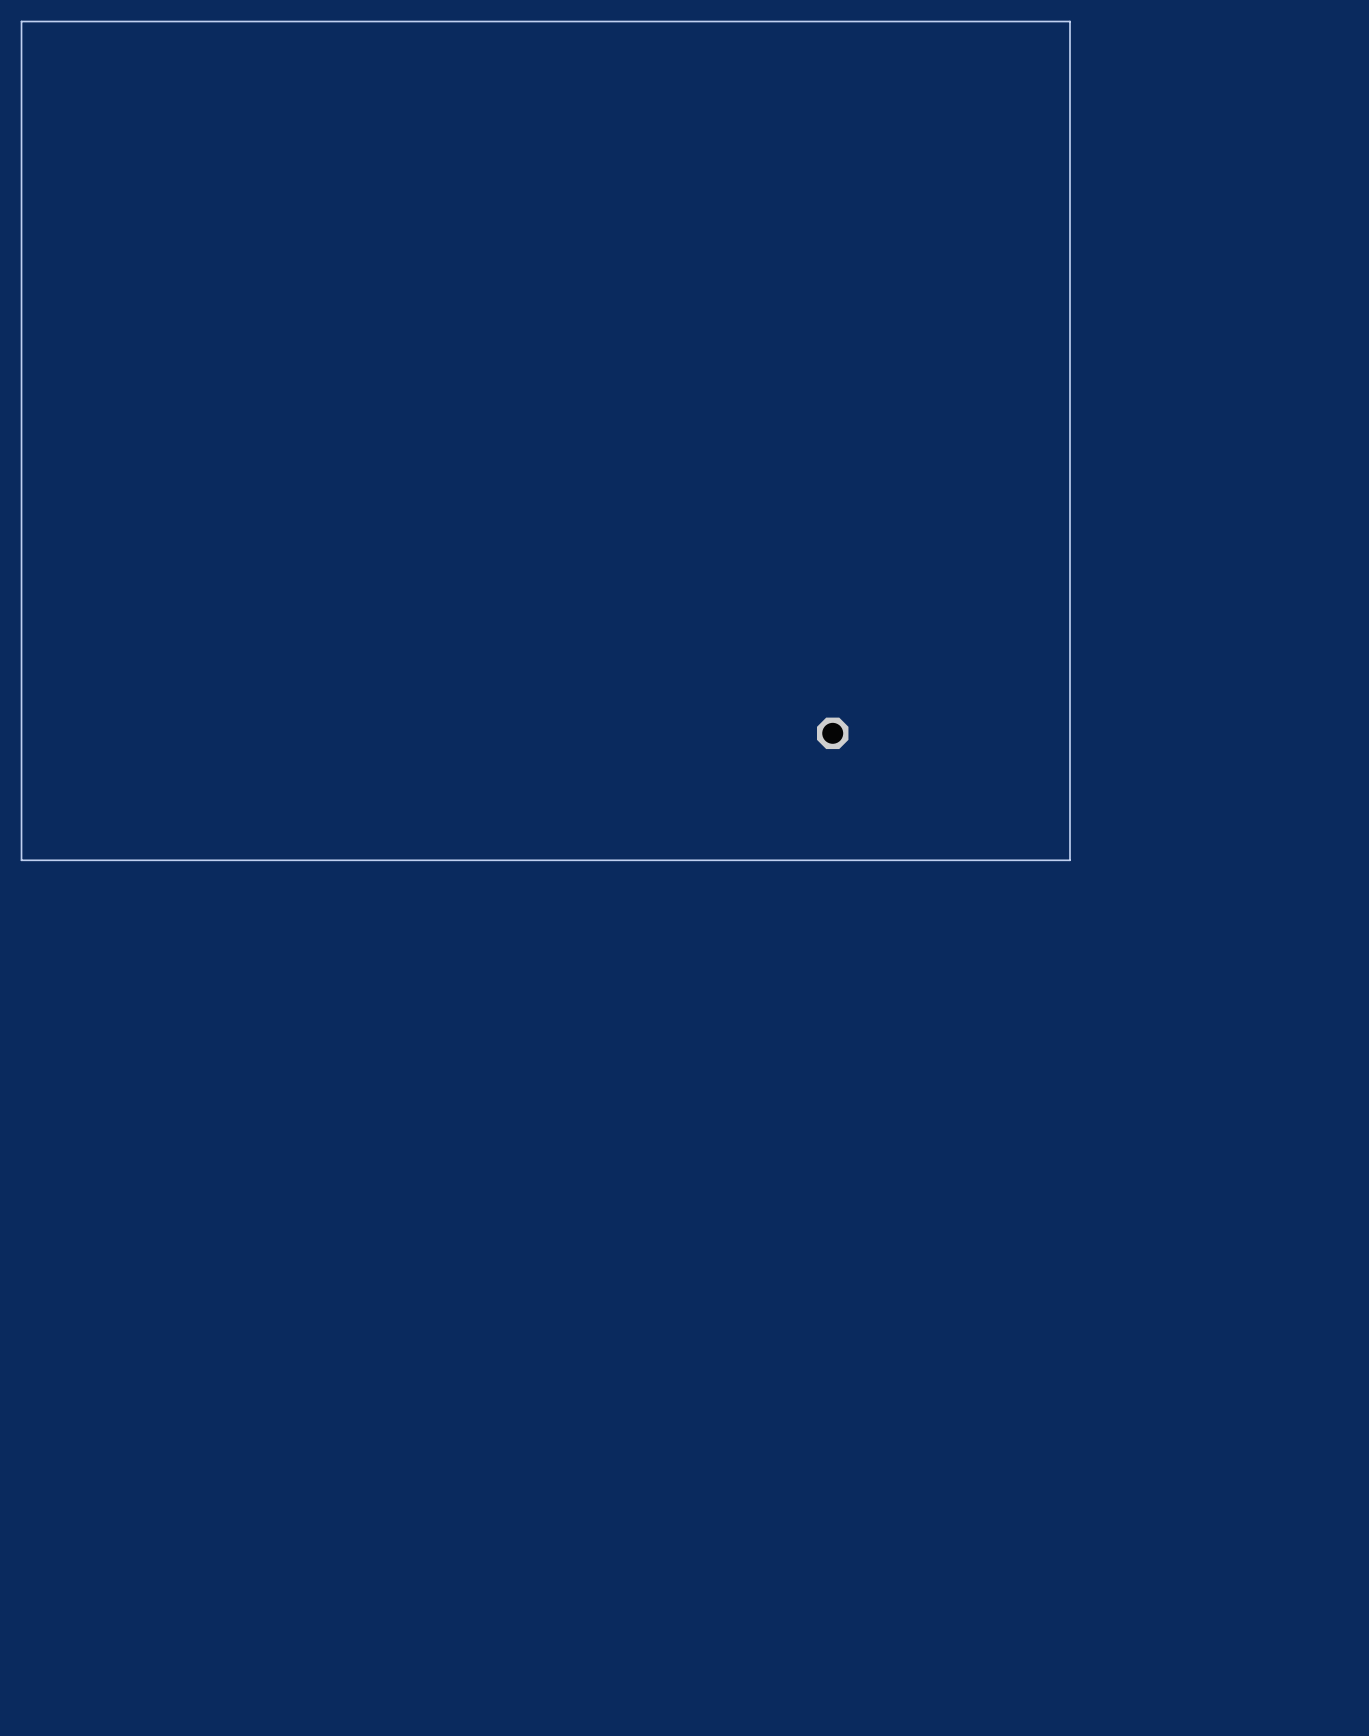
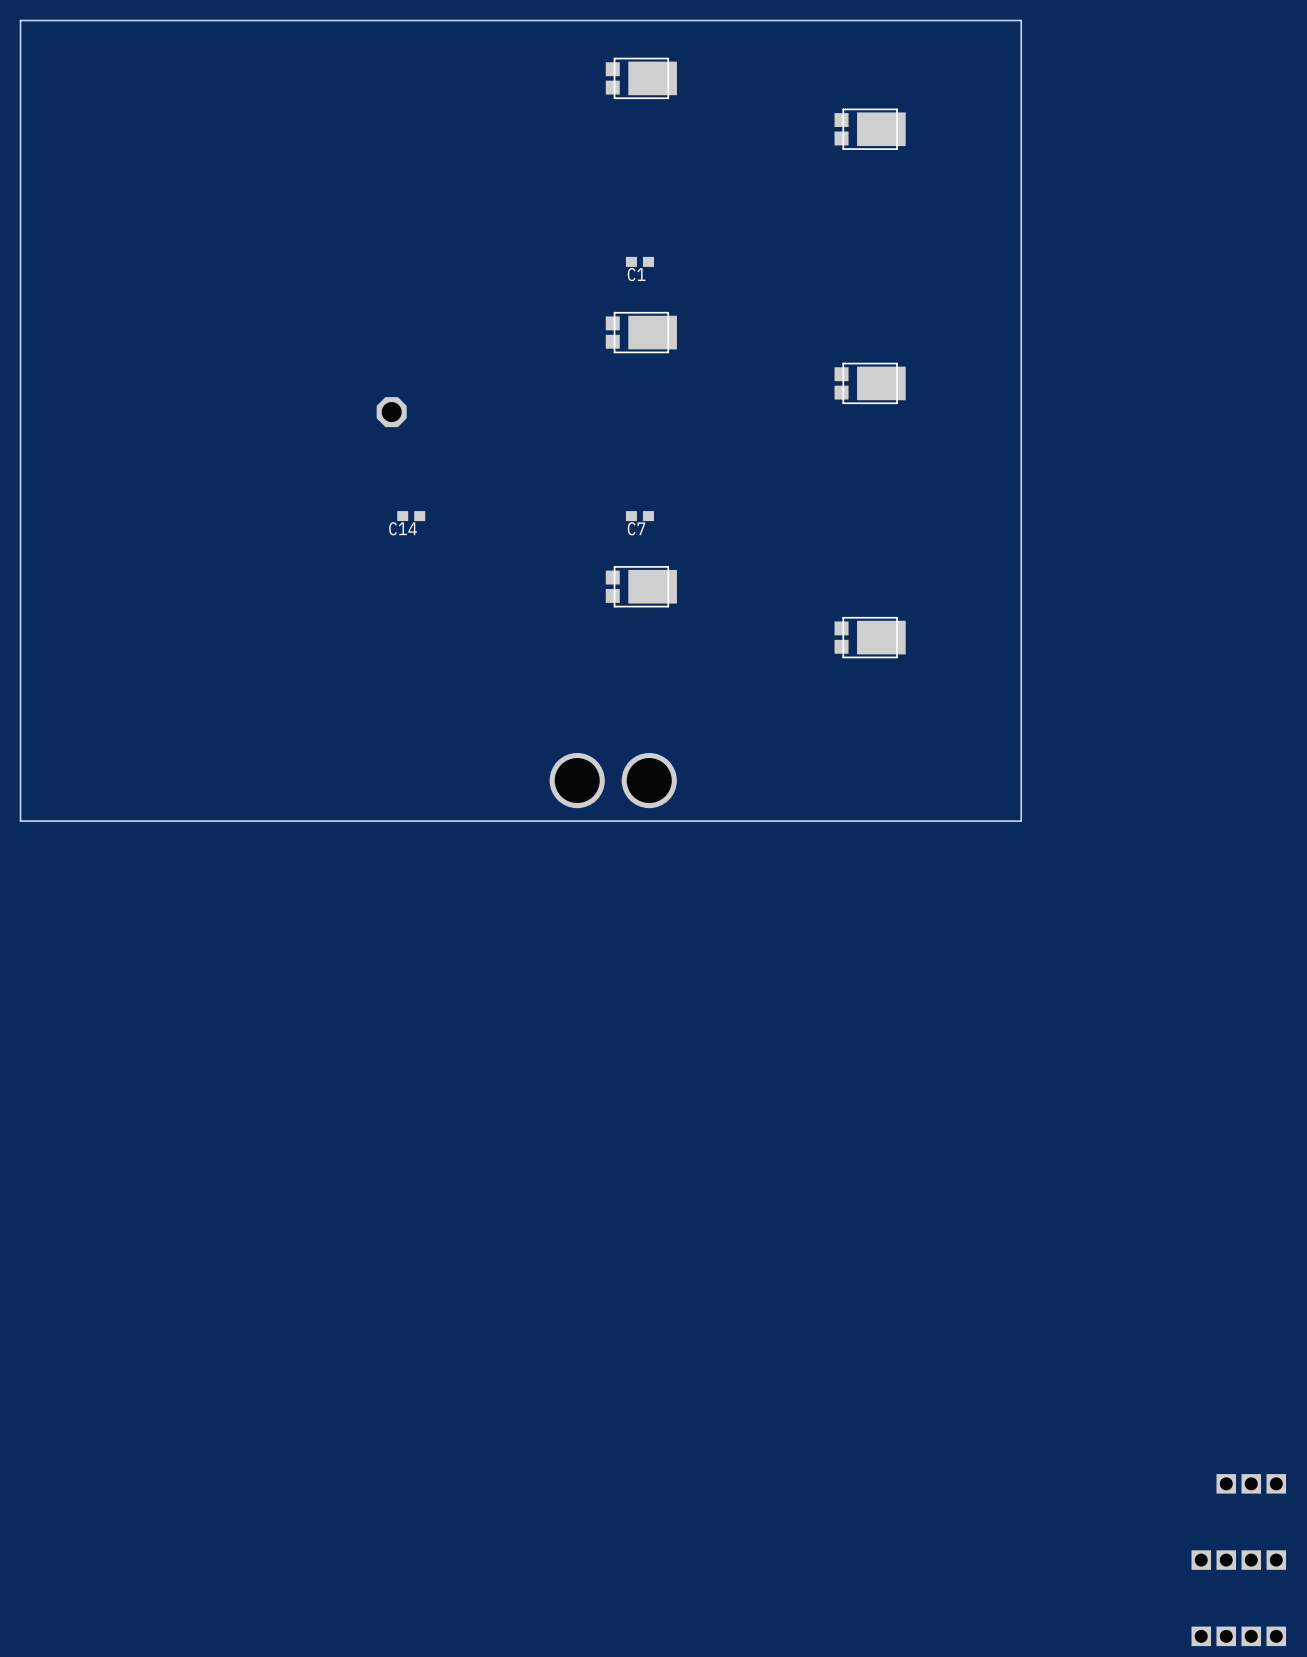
part: none -> (641, 78)
part: none -> (870, 129)
C1: none -> (639, 261)
part: none -> (641, 332)
part: none -> (870, 383)
part: none -> (391, 412)
C14: none -> (411, 516)
C7: none -> (639, 516)
part: none -> (641, 586)
part: none -> (870, 637)
part: (832, 733) -> none
part: none -> (613, 780)
part: none -> (1251, 1483)
part: none -> (1238, 1560)
part: none -> (1238, 1636)

